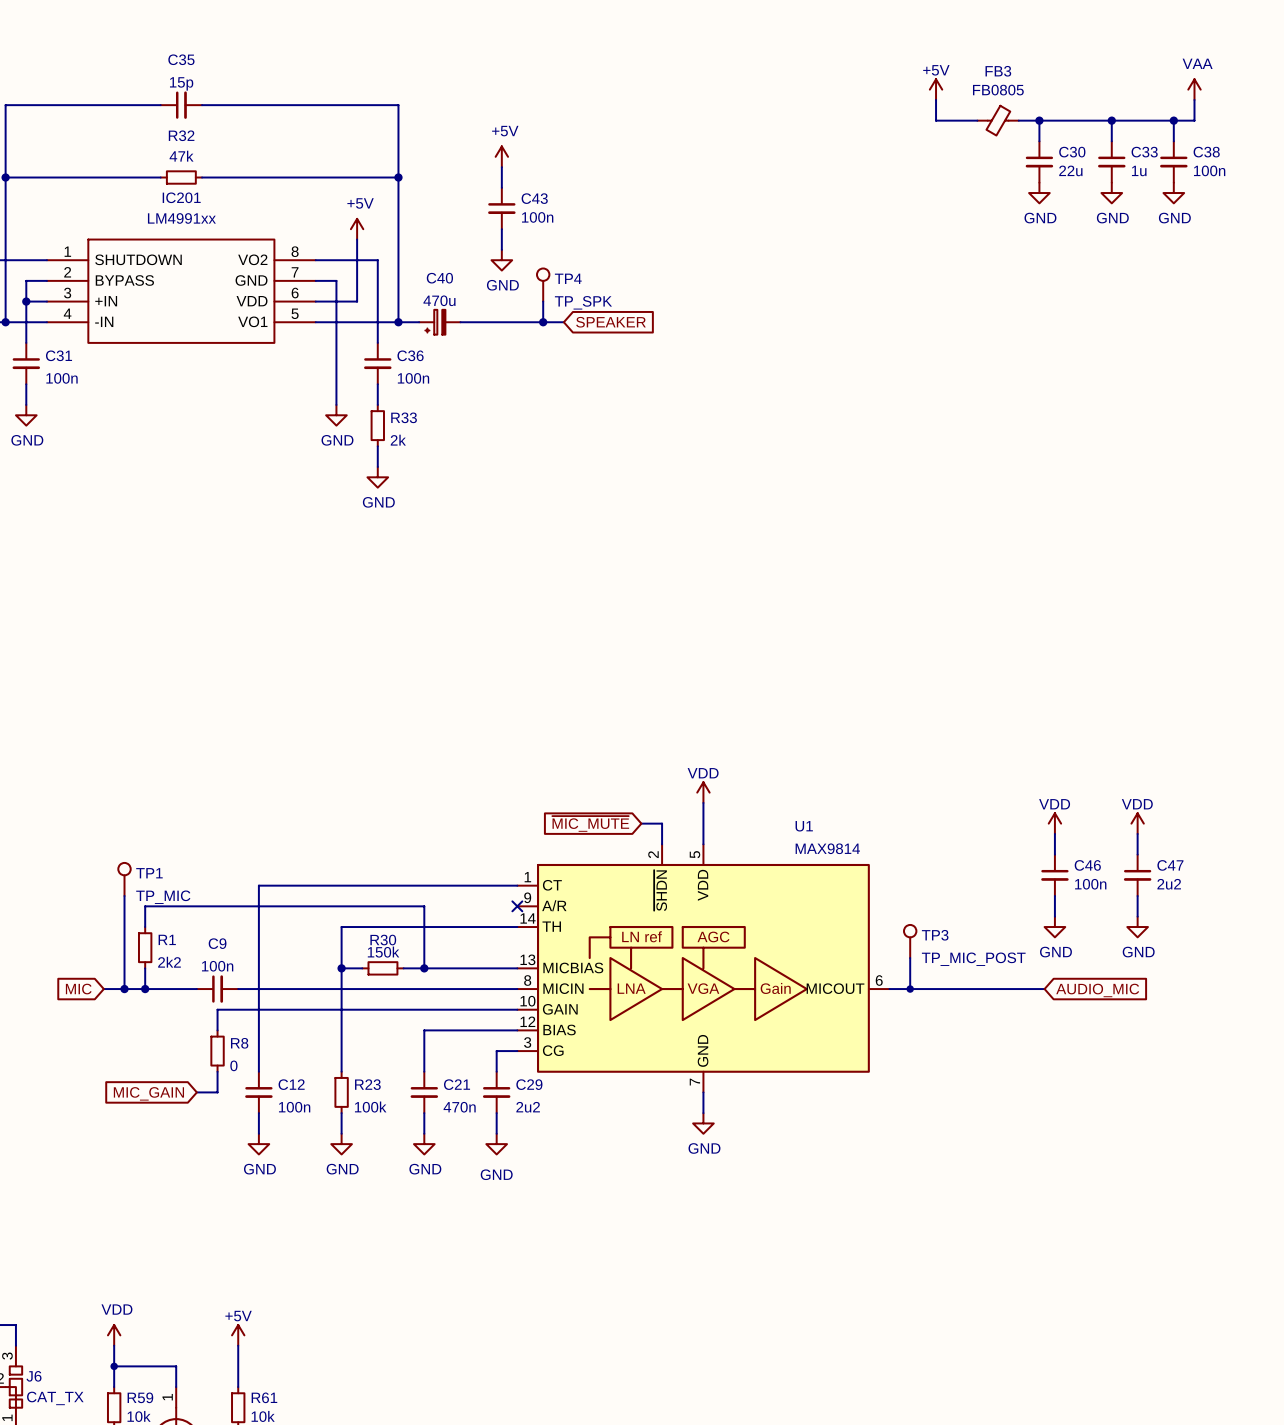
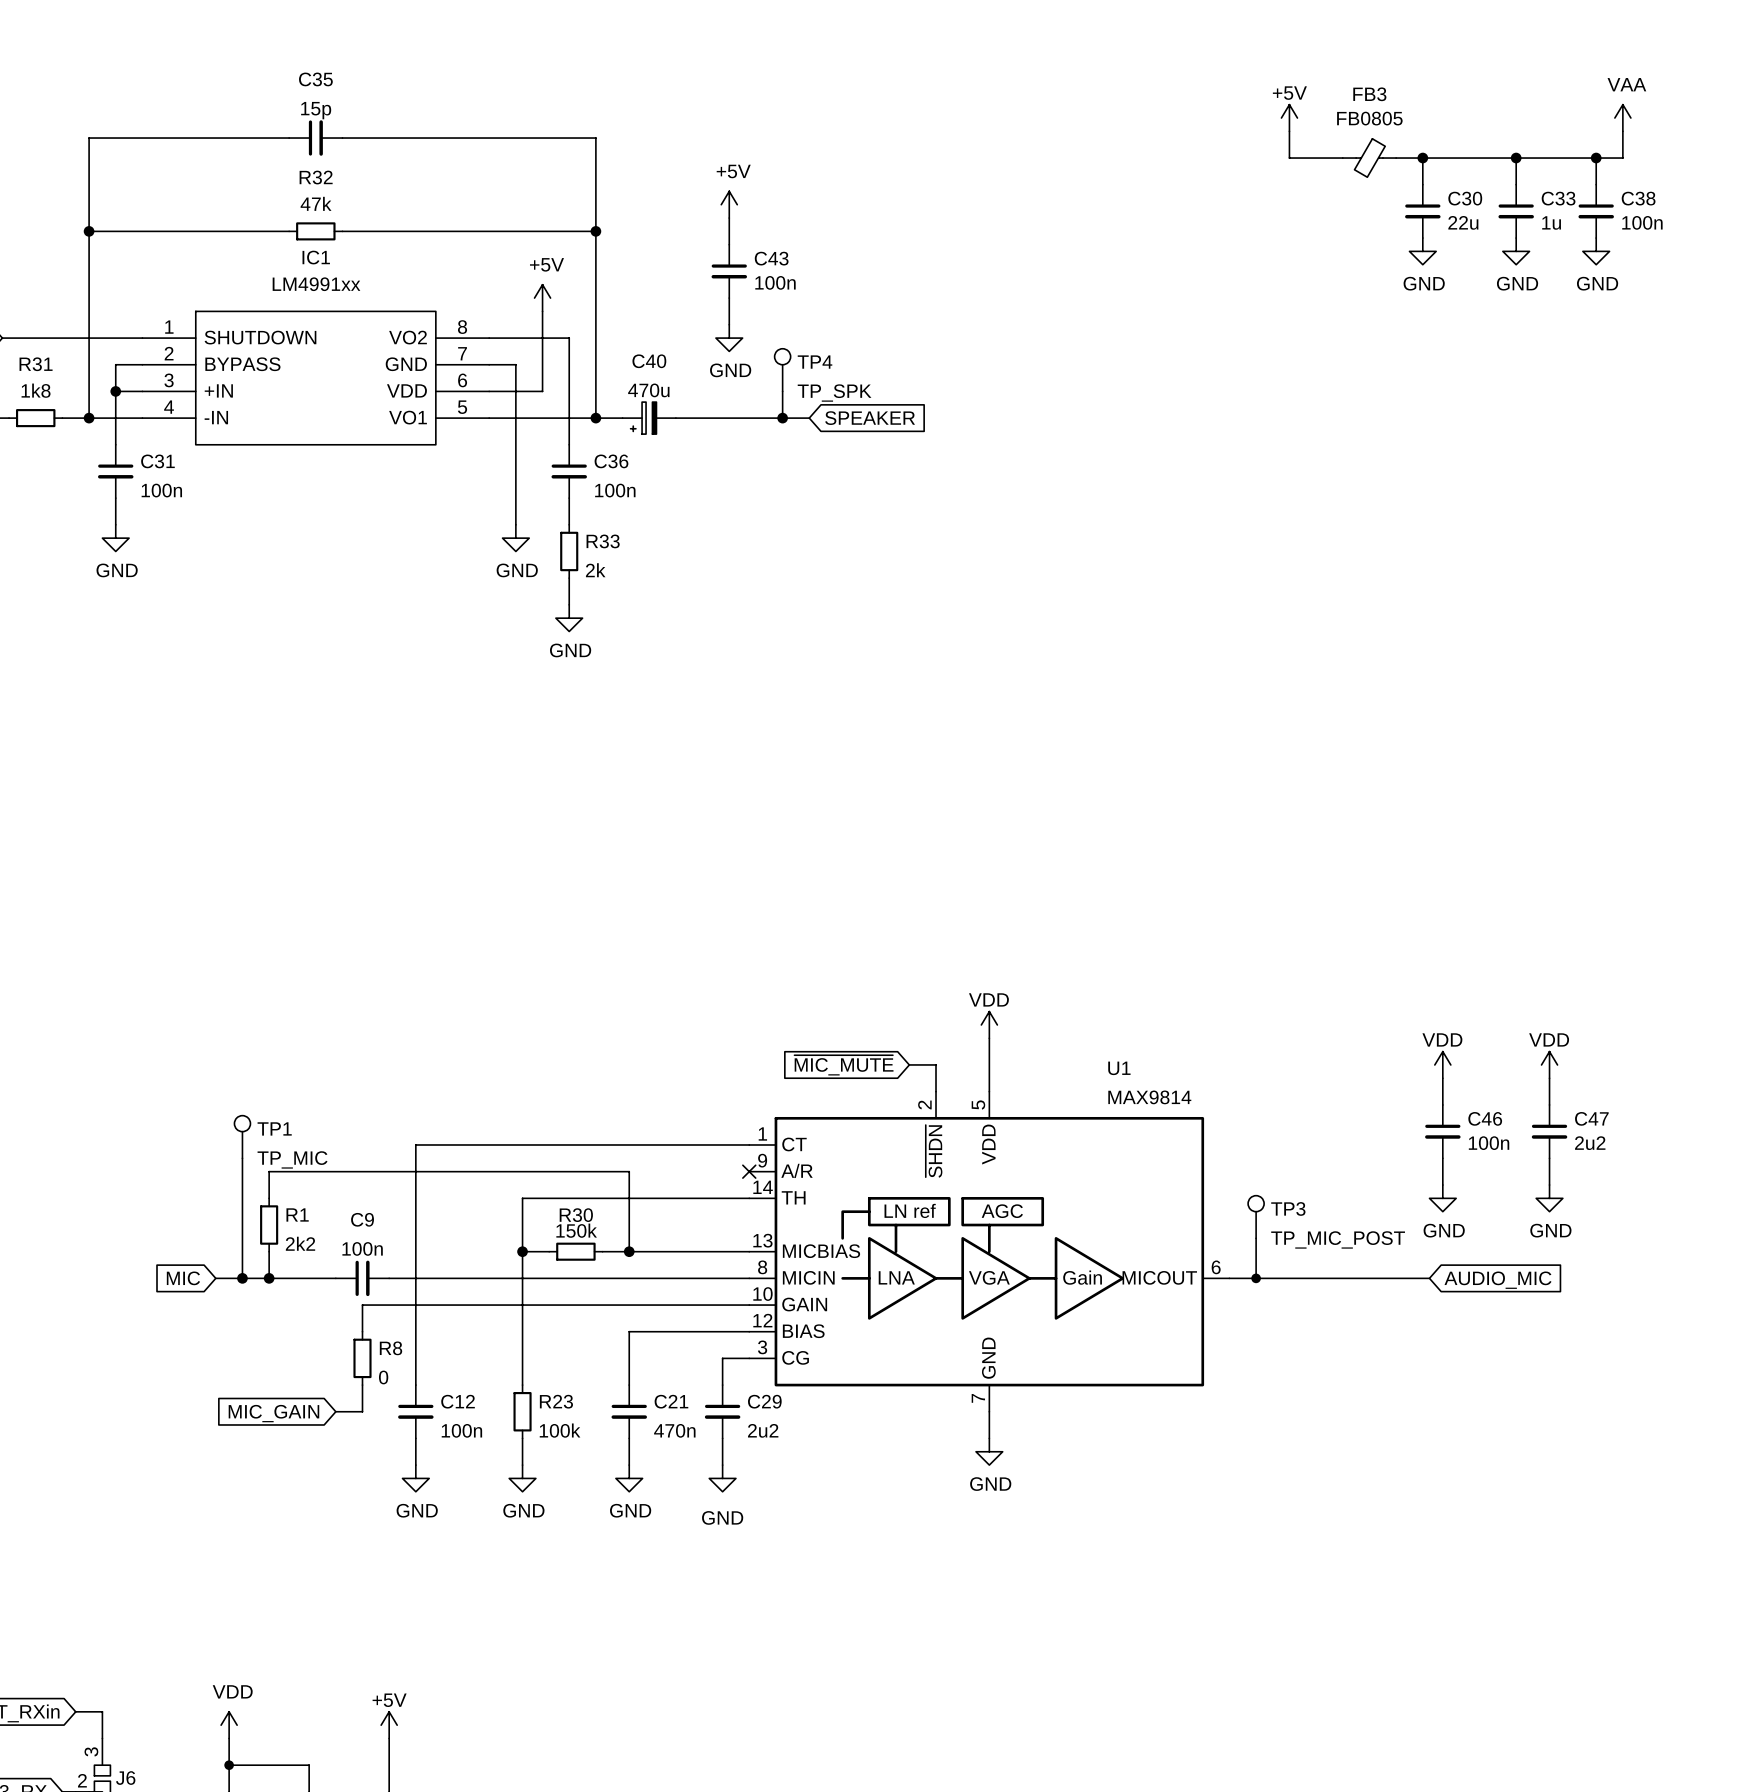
IC201 name: IC201 (181, 197) -> IC1 (316, 257)

